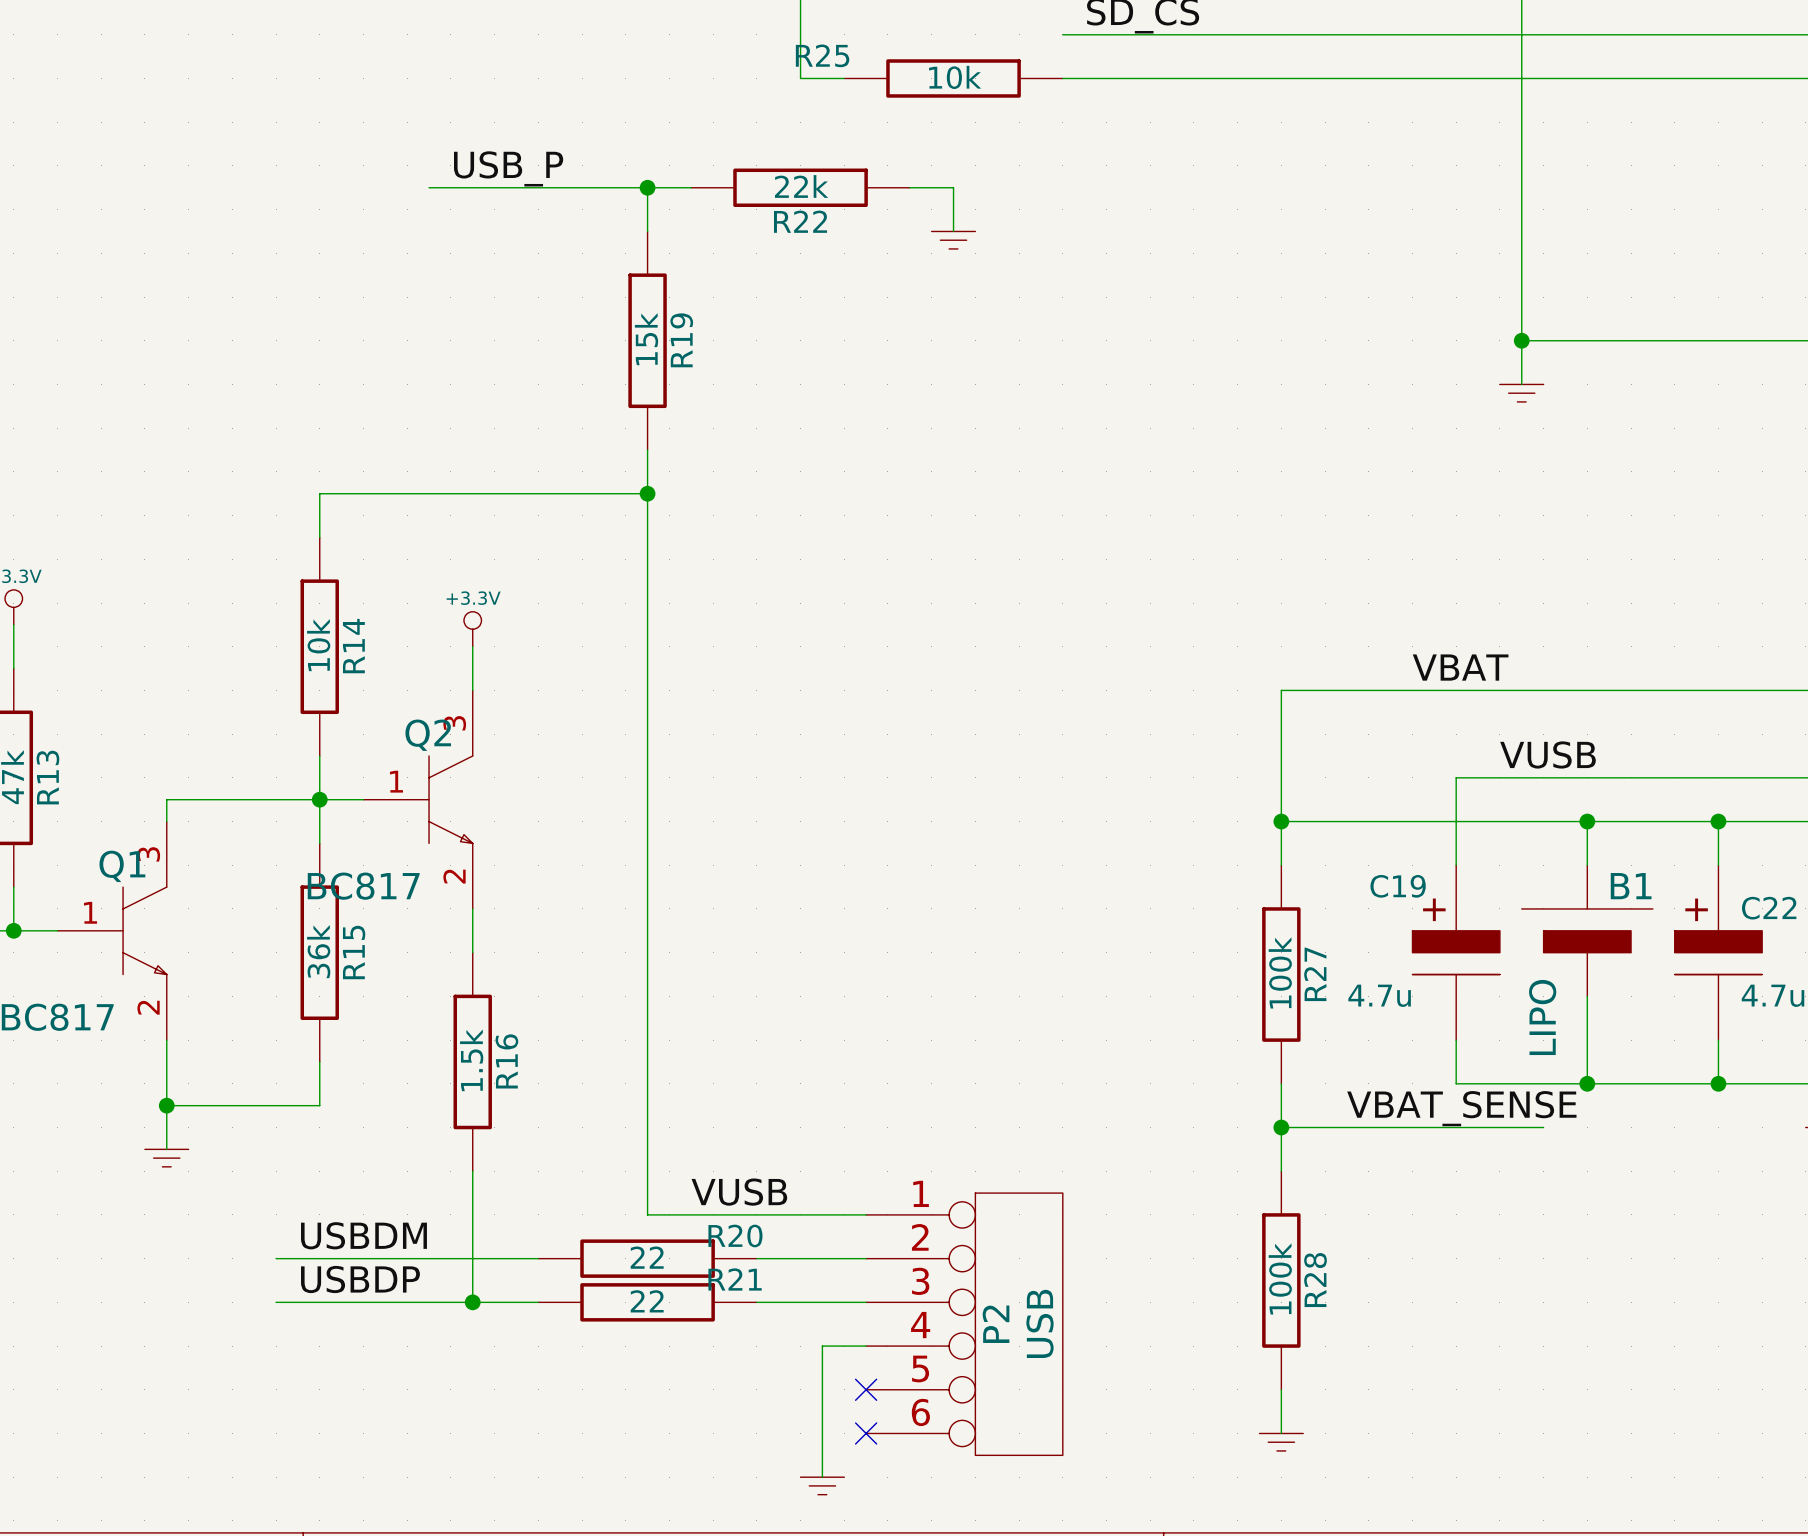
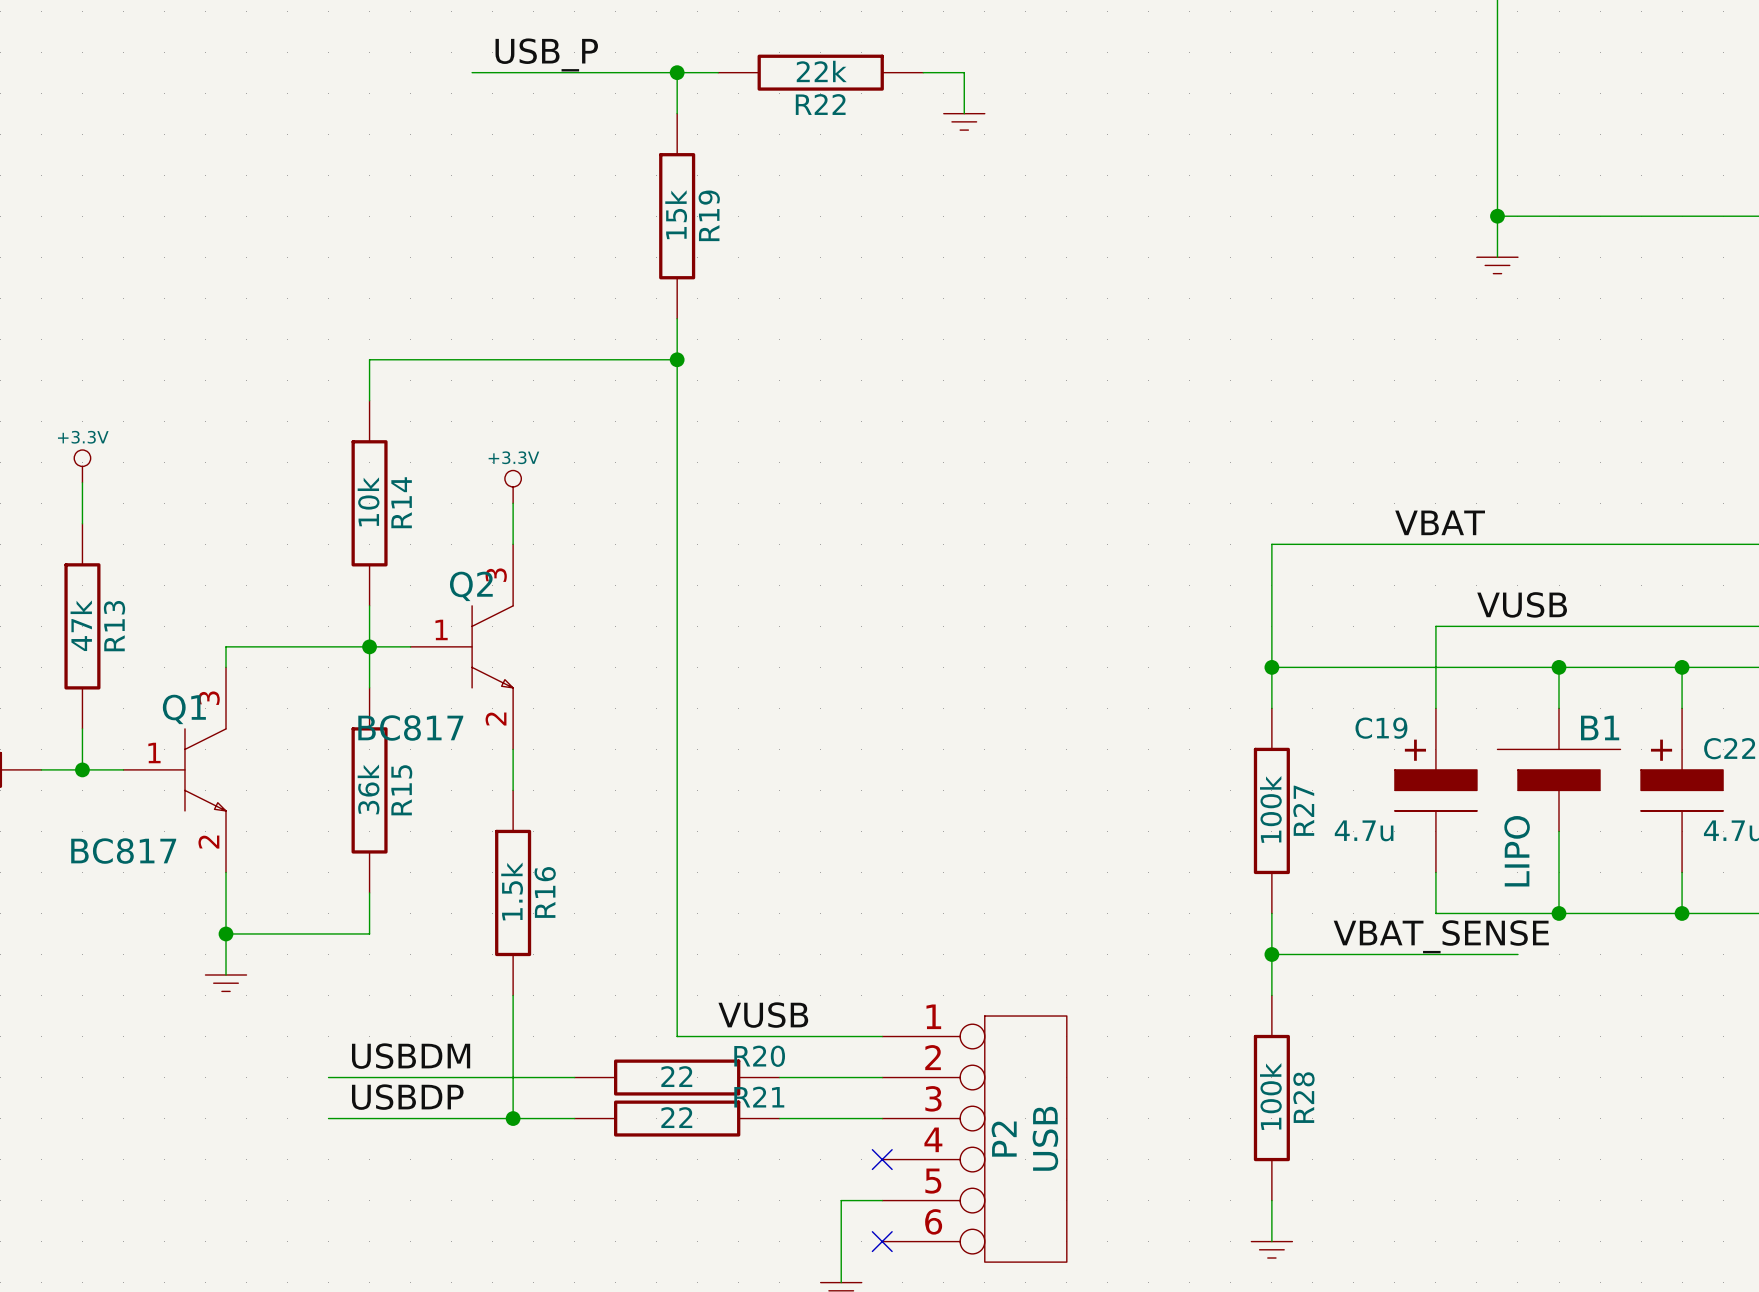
wire: (866, 1346) (822, 1346) (822, 1389) -> (882, 1200) (841, 1200)
no-connect mark position: (866, 1389) -> (882, 1159)

